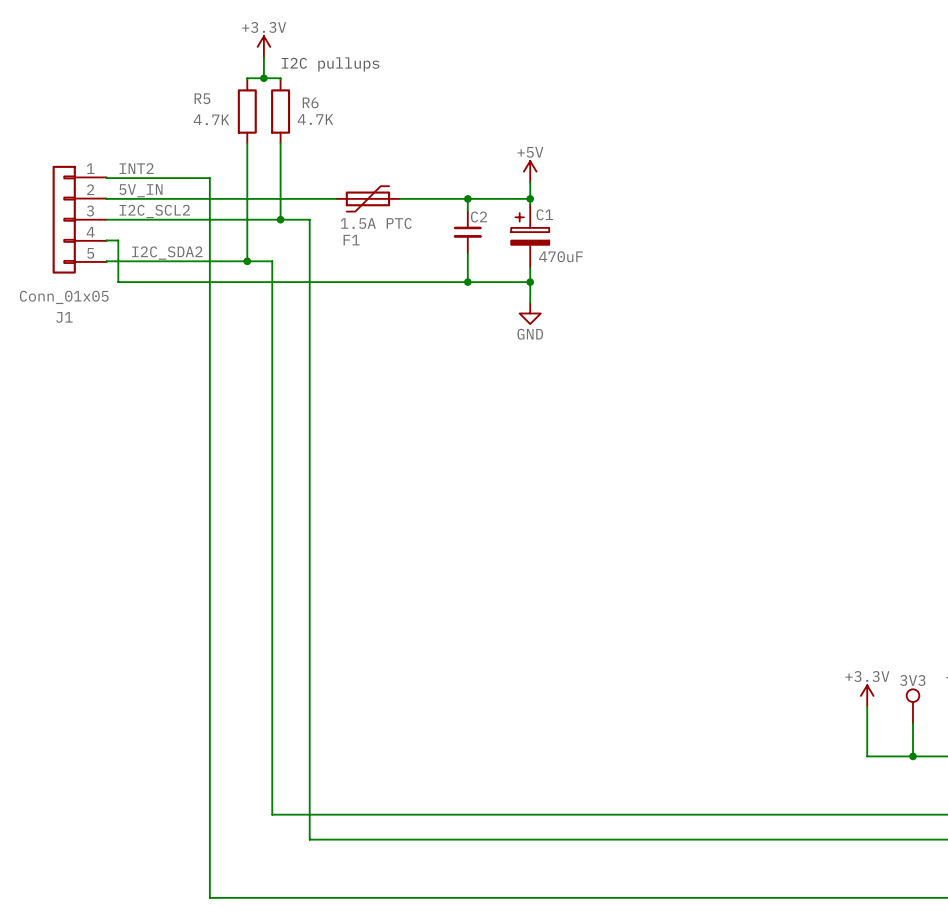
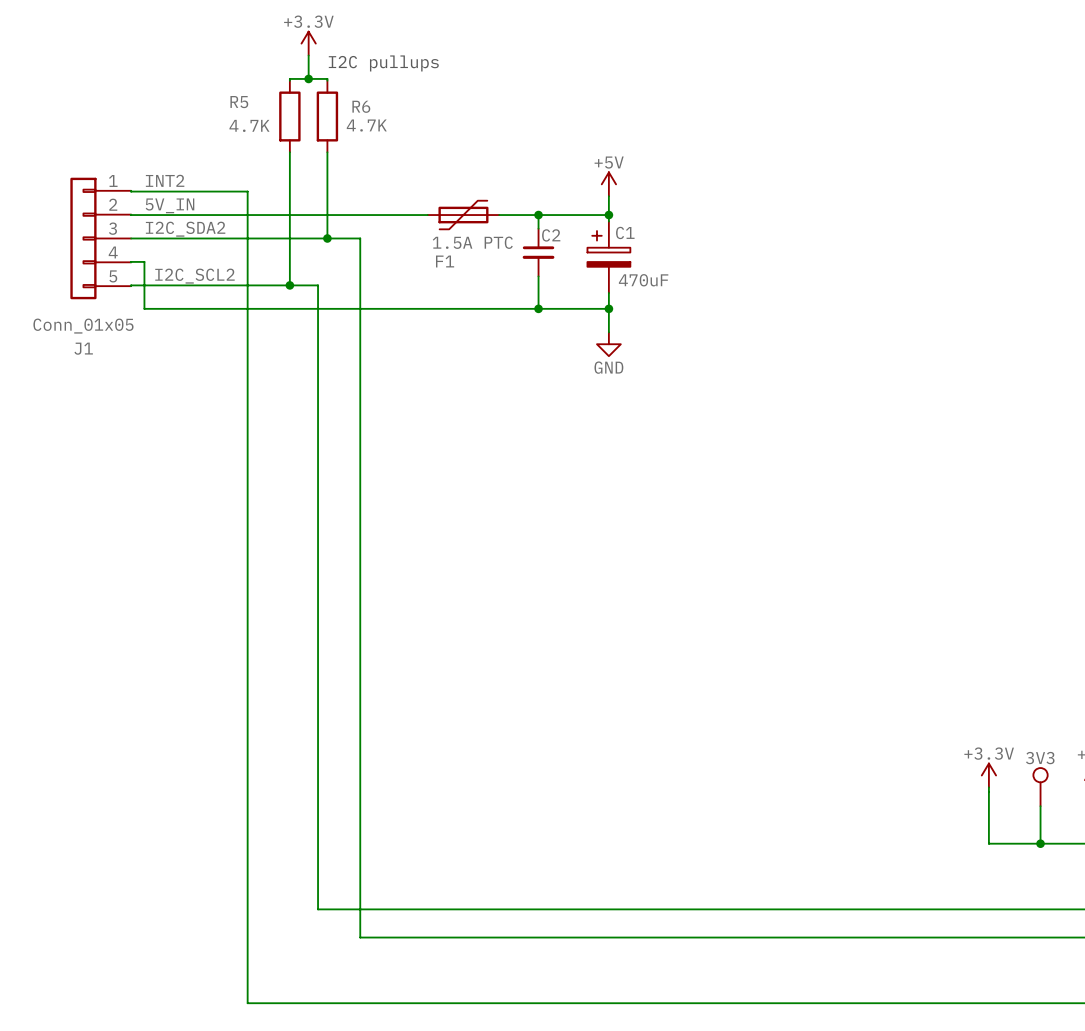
F1 position: (367, 198) -> (463, 215)
label: I2C_SCL2 (154, 211) -> I2C_SDA2 (185, 229)
label: I2C_SDA2 (167, 253) -> I2C_SCL2 (194, 276)

